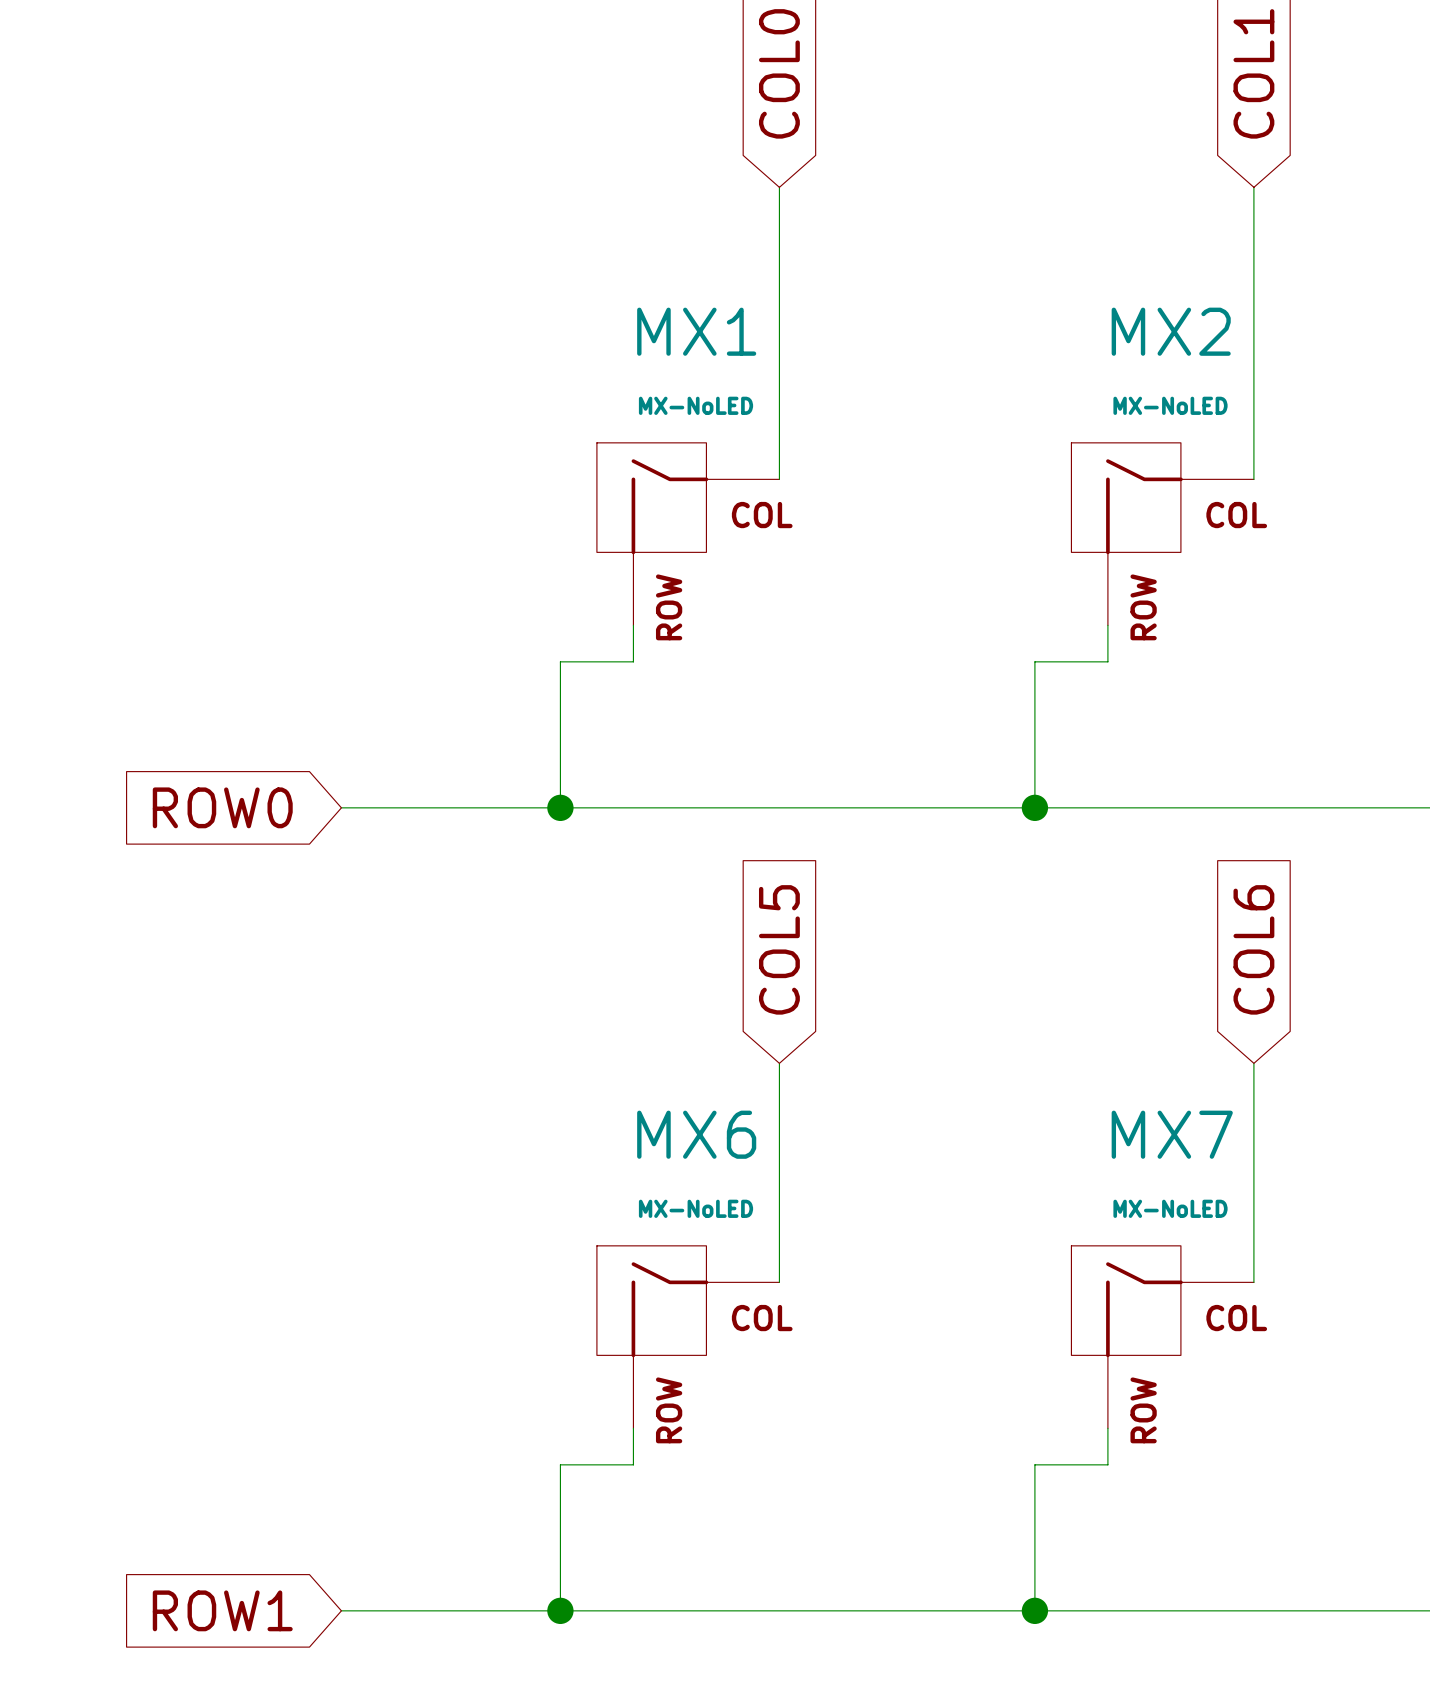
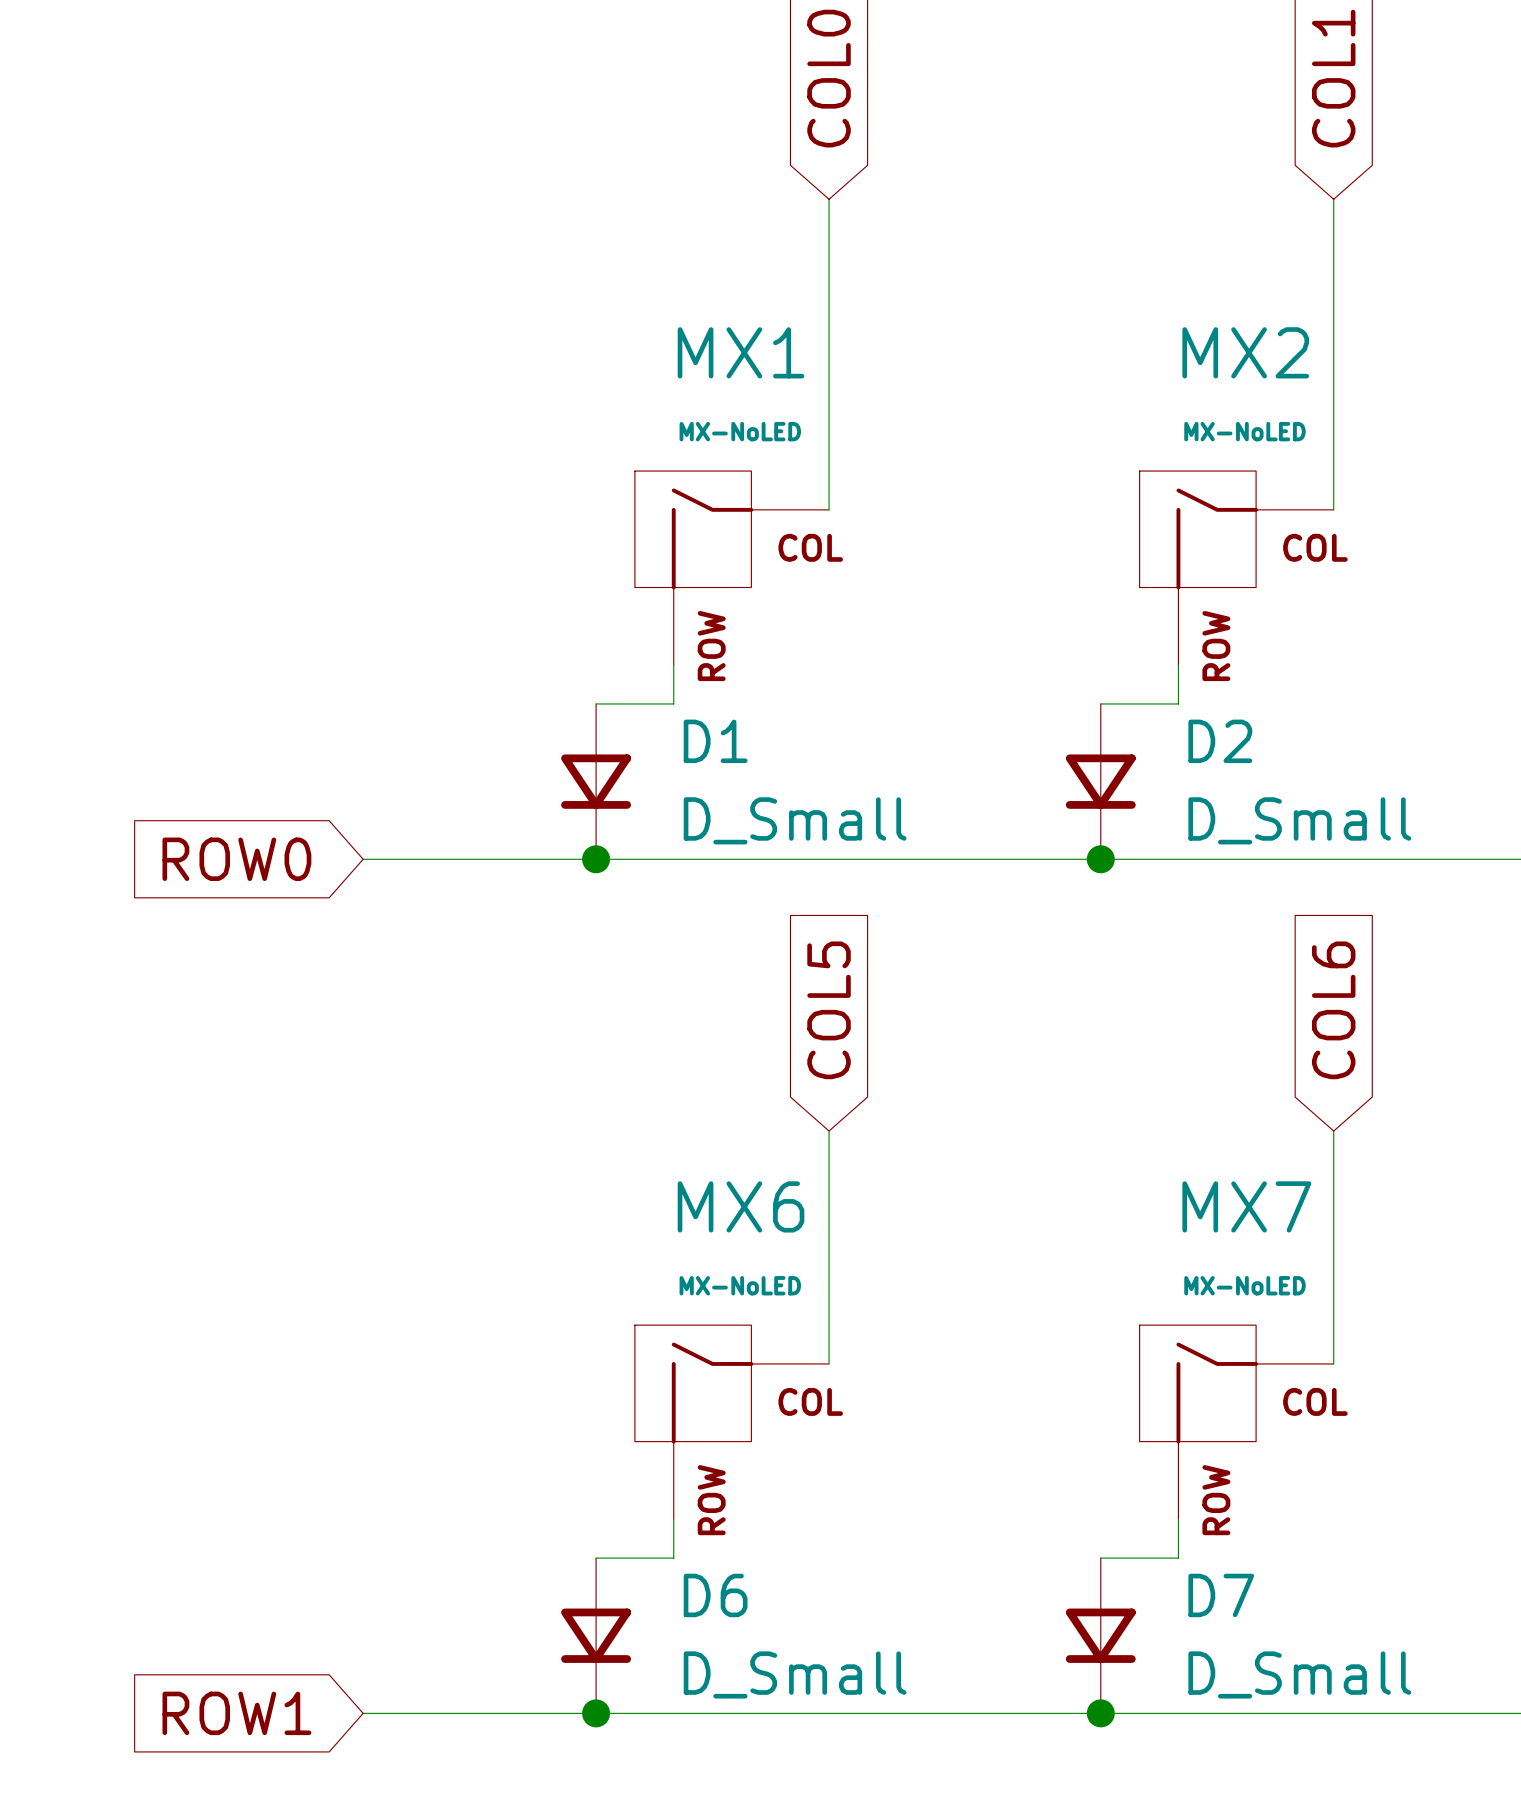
D1: none -> D_Small (596, 781)
D2: none -> D_Small (1100, 781)
D6: none -> D_Small (596, 1635)
D7: none -> D_Small (1100, 1635)

